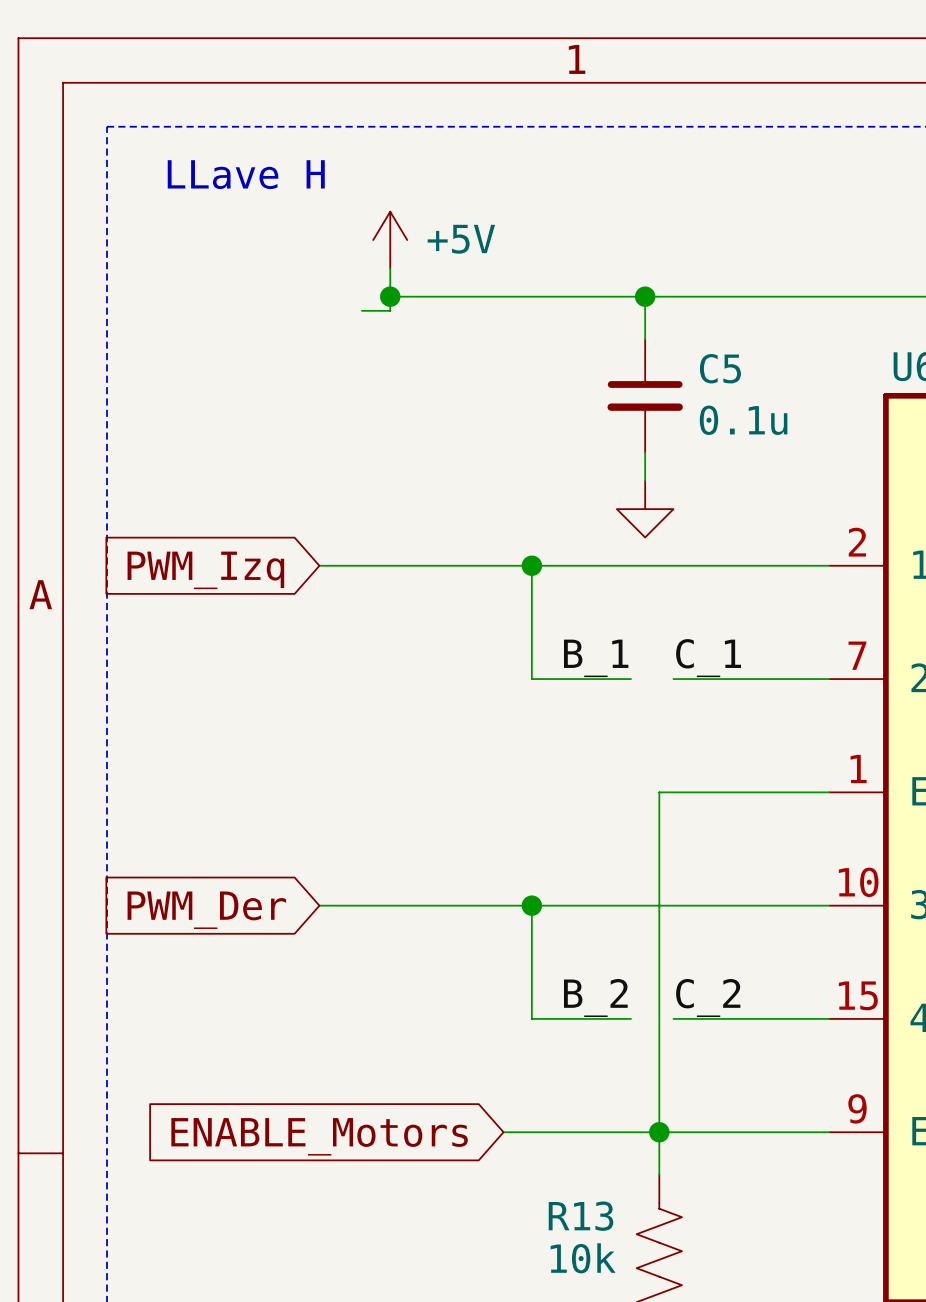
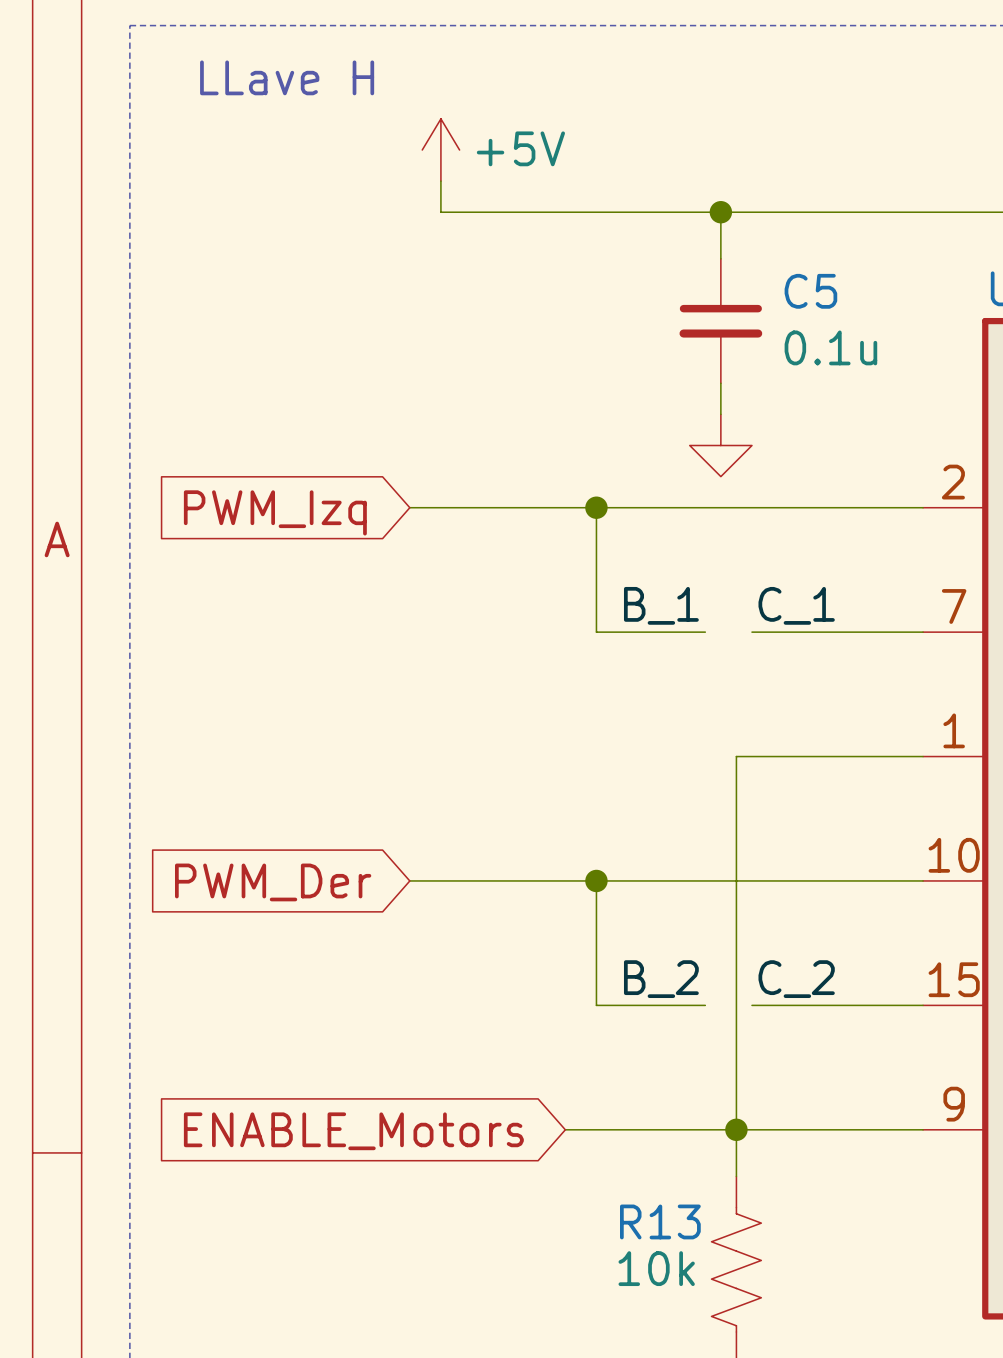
wire: (390, 296) (390, 310) (361, 310) -> none
junction: (390, 296) -> none
wire: (319, 565) (361, 565) -> none
global label position: PWM_Izq (205, 570) -> PWM_Izq (275, 512)
wire: (319, 905) (361, 905) -> none
global label position: PWM_Der (206, 910) -> PWM_Der (273, 882)

